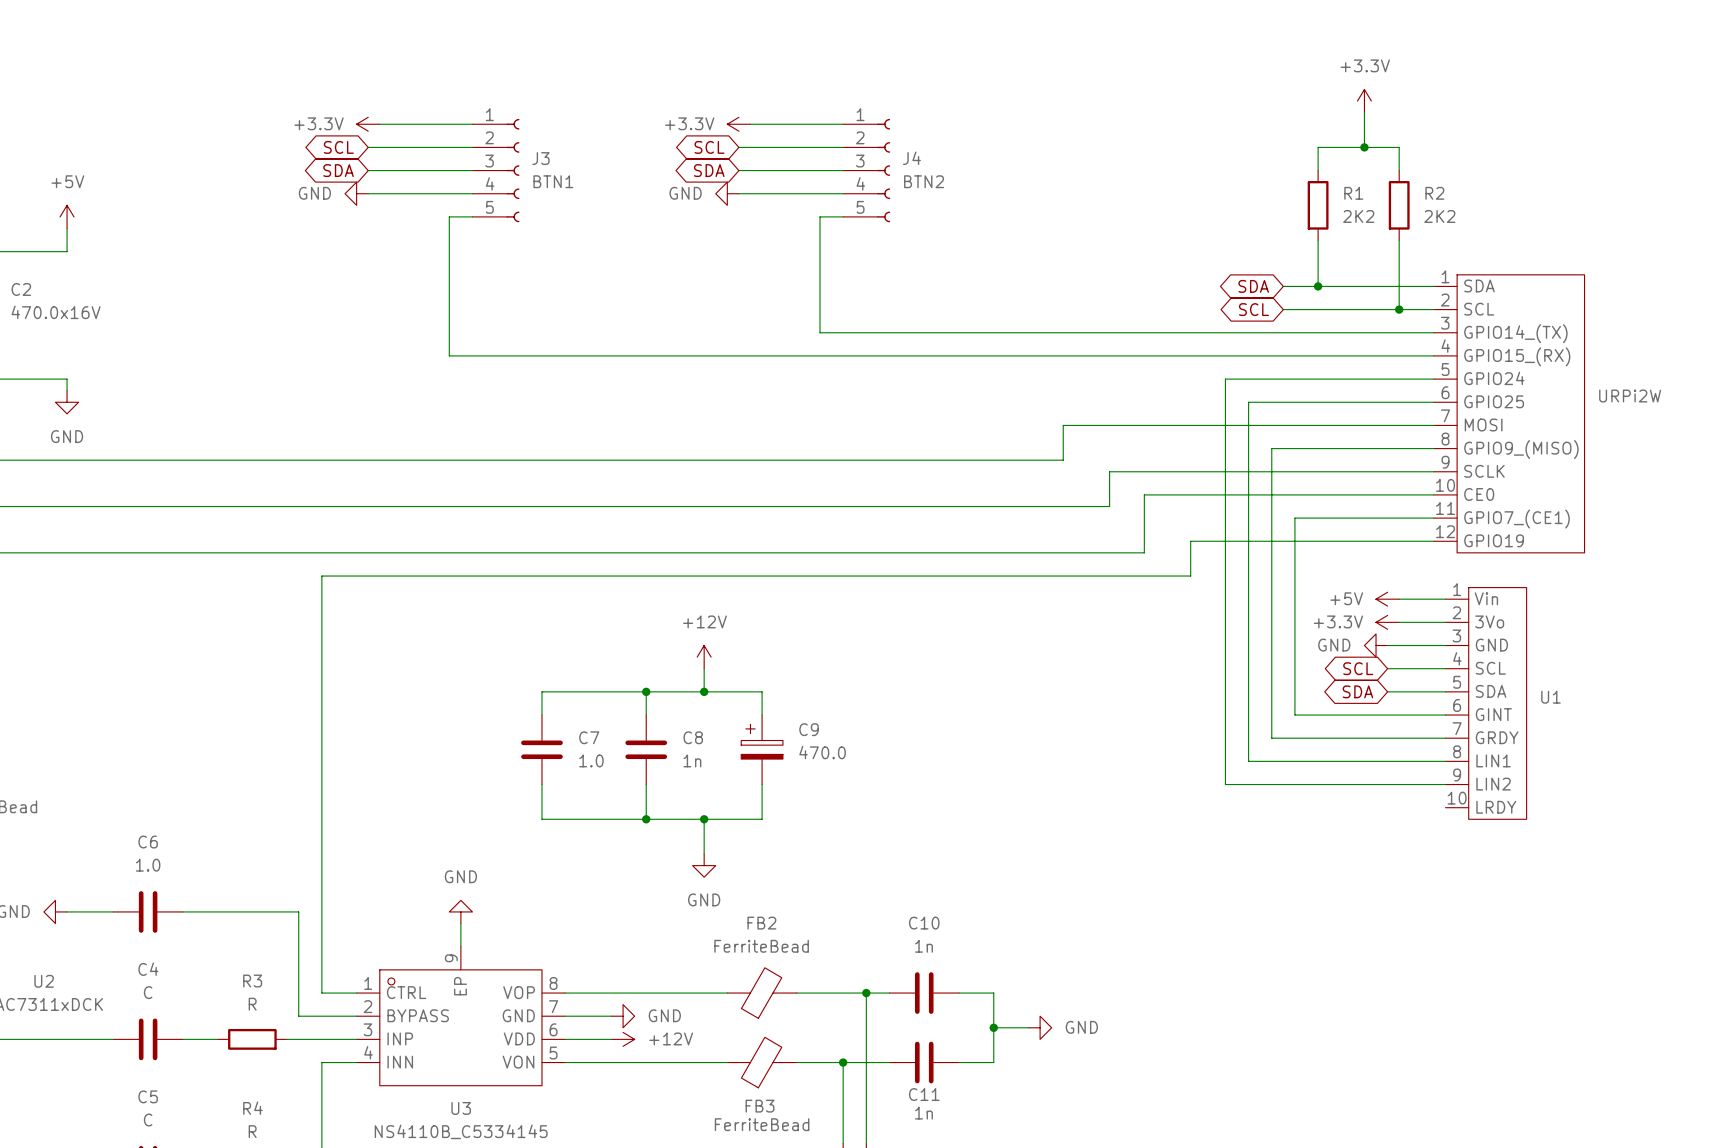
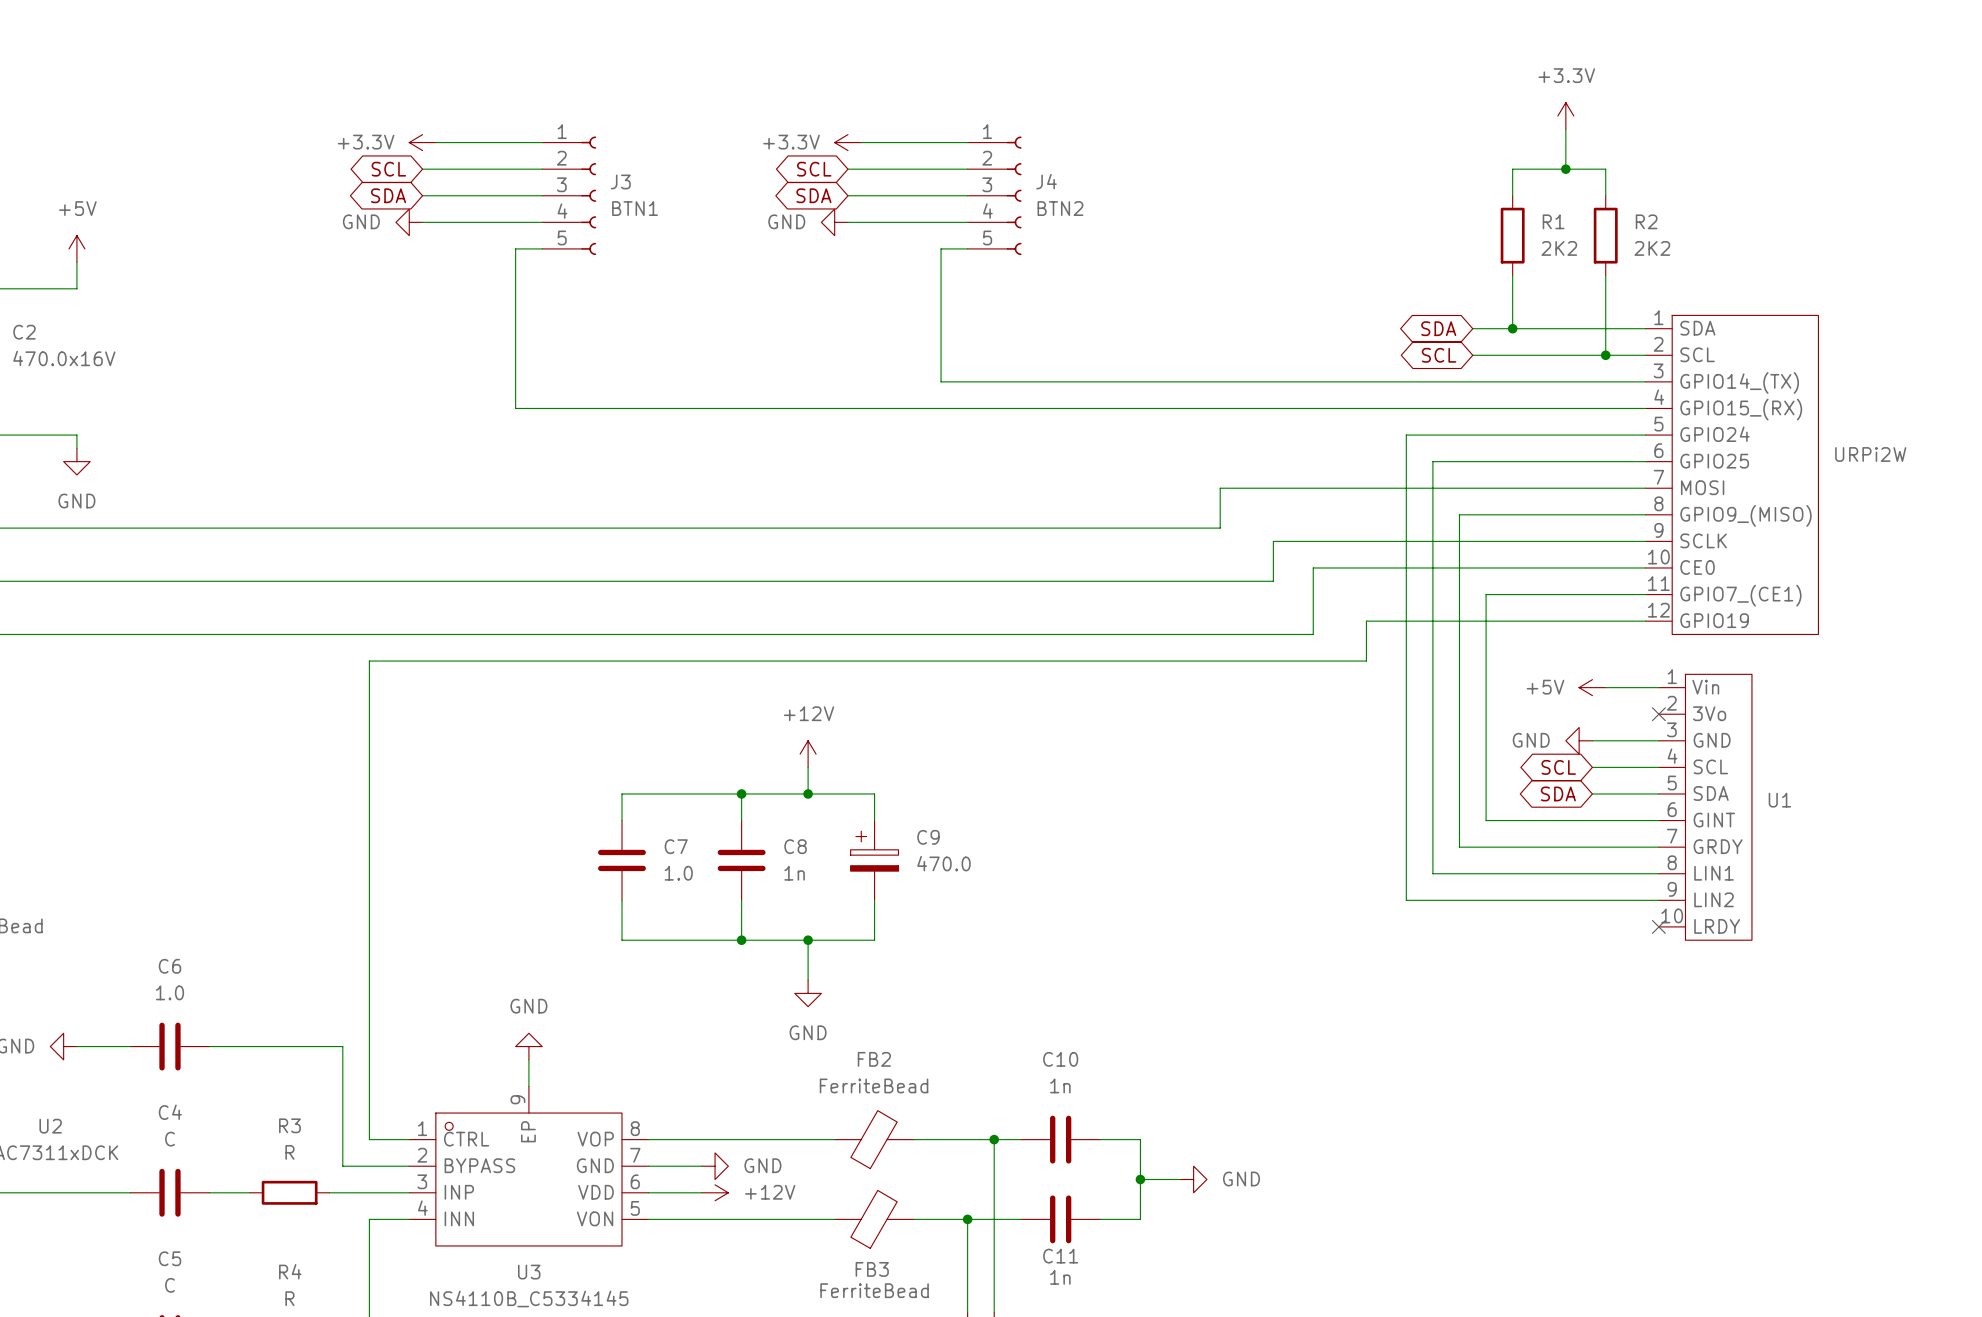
power symbol: +3.3V (1387, 622) -> none
wire: (1399, 622) (1445, 622) -> none
no-connect mark: none -> (1658, 714)
no-connect mark: none -> (1658, 926)

